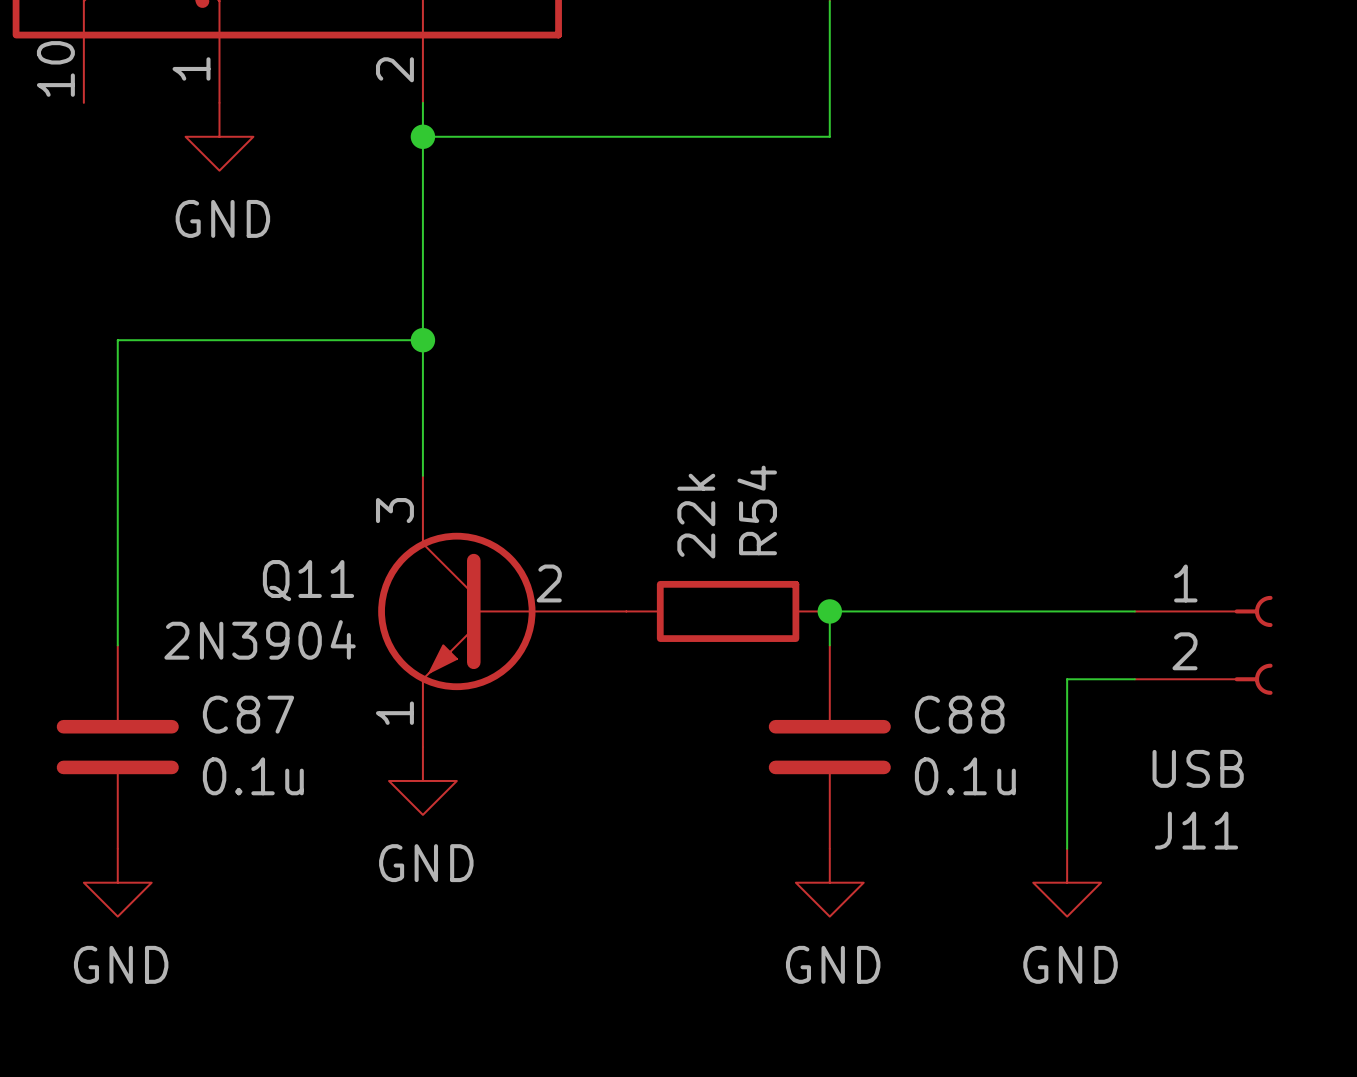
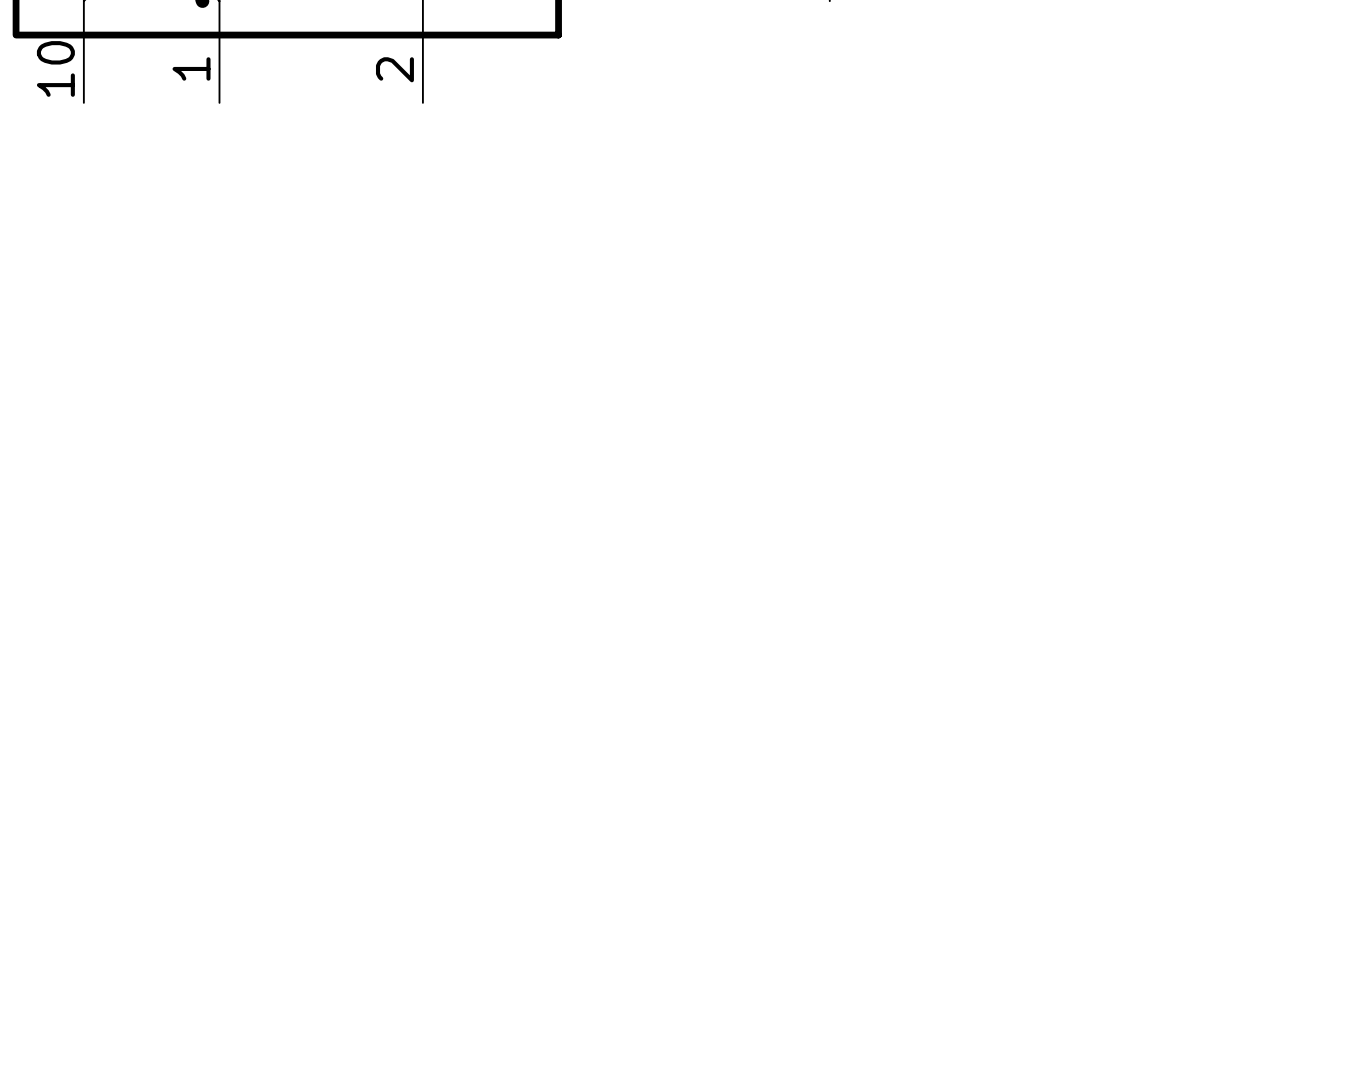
wire: (829, 1) (829, 136) (422, 136) -> none
wire: (422, 102) (422, 475) -> none
power symbol: GND (219, 136) -> none
junction: (422, 136) -> none
wire: (422, 340) (117, 340) (117, 645) -> none
junction: (422, 340) -> none
Q11: 2N3904 (502, 611) -> none
R54: 22k (728, 611) -> none
junction: (829, 611) -> none
wire: (1134, 611) (829, 611) (829, 645) -> none
J11: USB (1203, 645) -> none
wire: (1134, 679) (1067, 679) (1067, 848) -> none
C87: 0.1u (117, 747) -> none
C88: 0.1u (829, 747) -> none
power symbol: GND (422, 780) -> none
power symbol: GND (117, 882) -> none
power symbol: GND (829, 882) -> none
power symbol: GND (1067, 882) -> none

